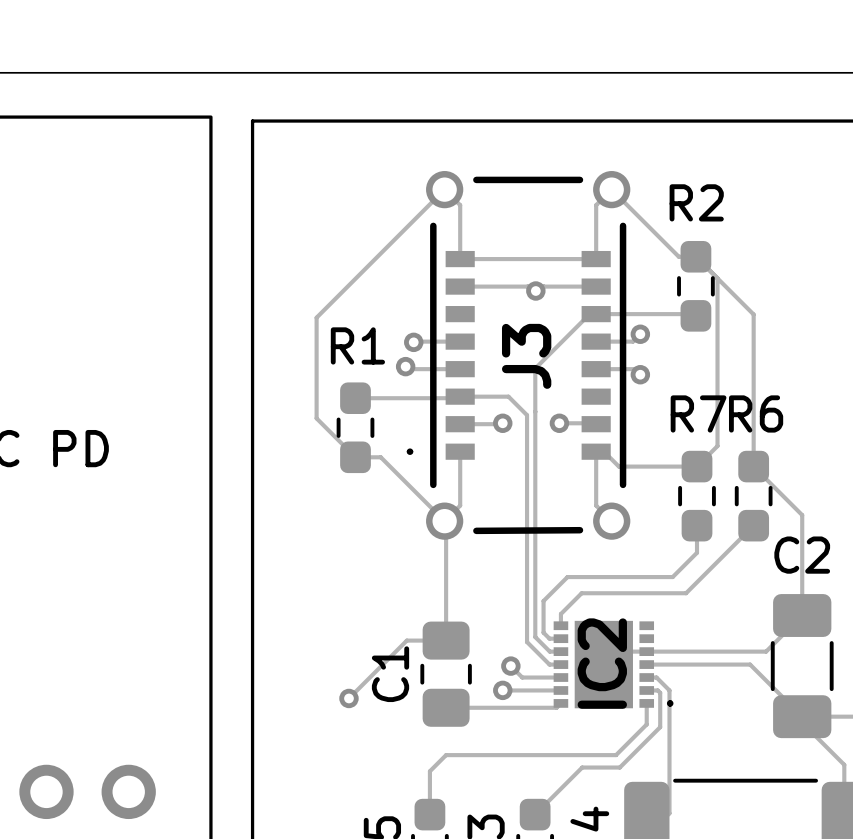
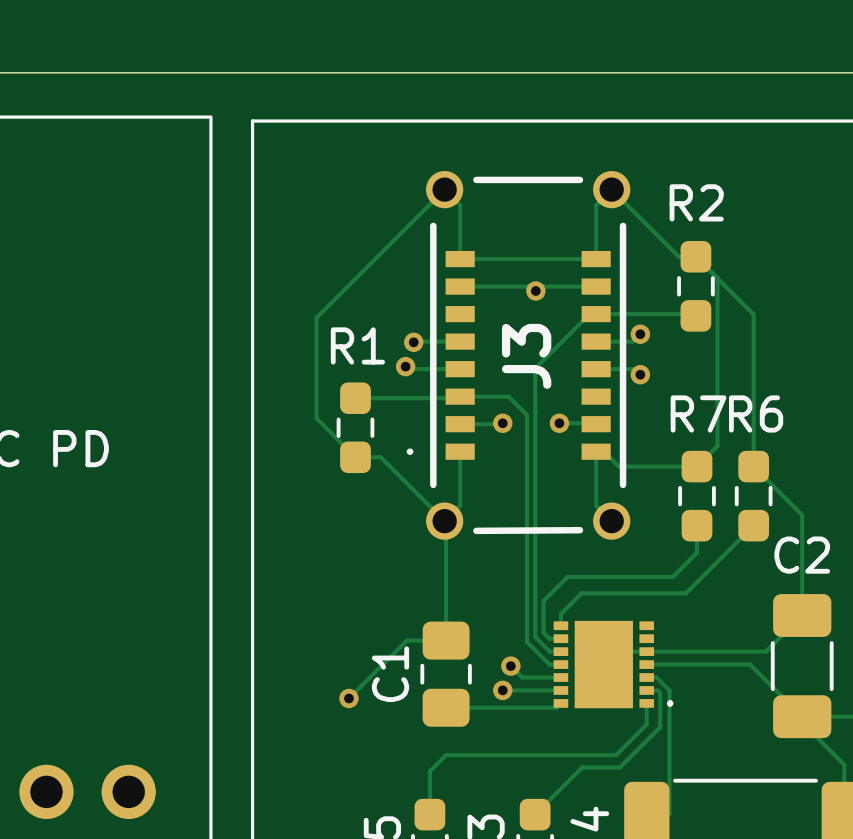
IC2 name: IC2 (602, 663) -> none

